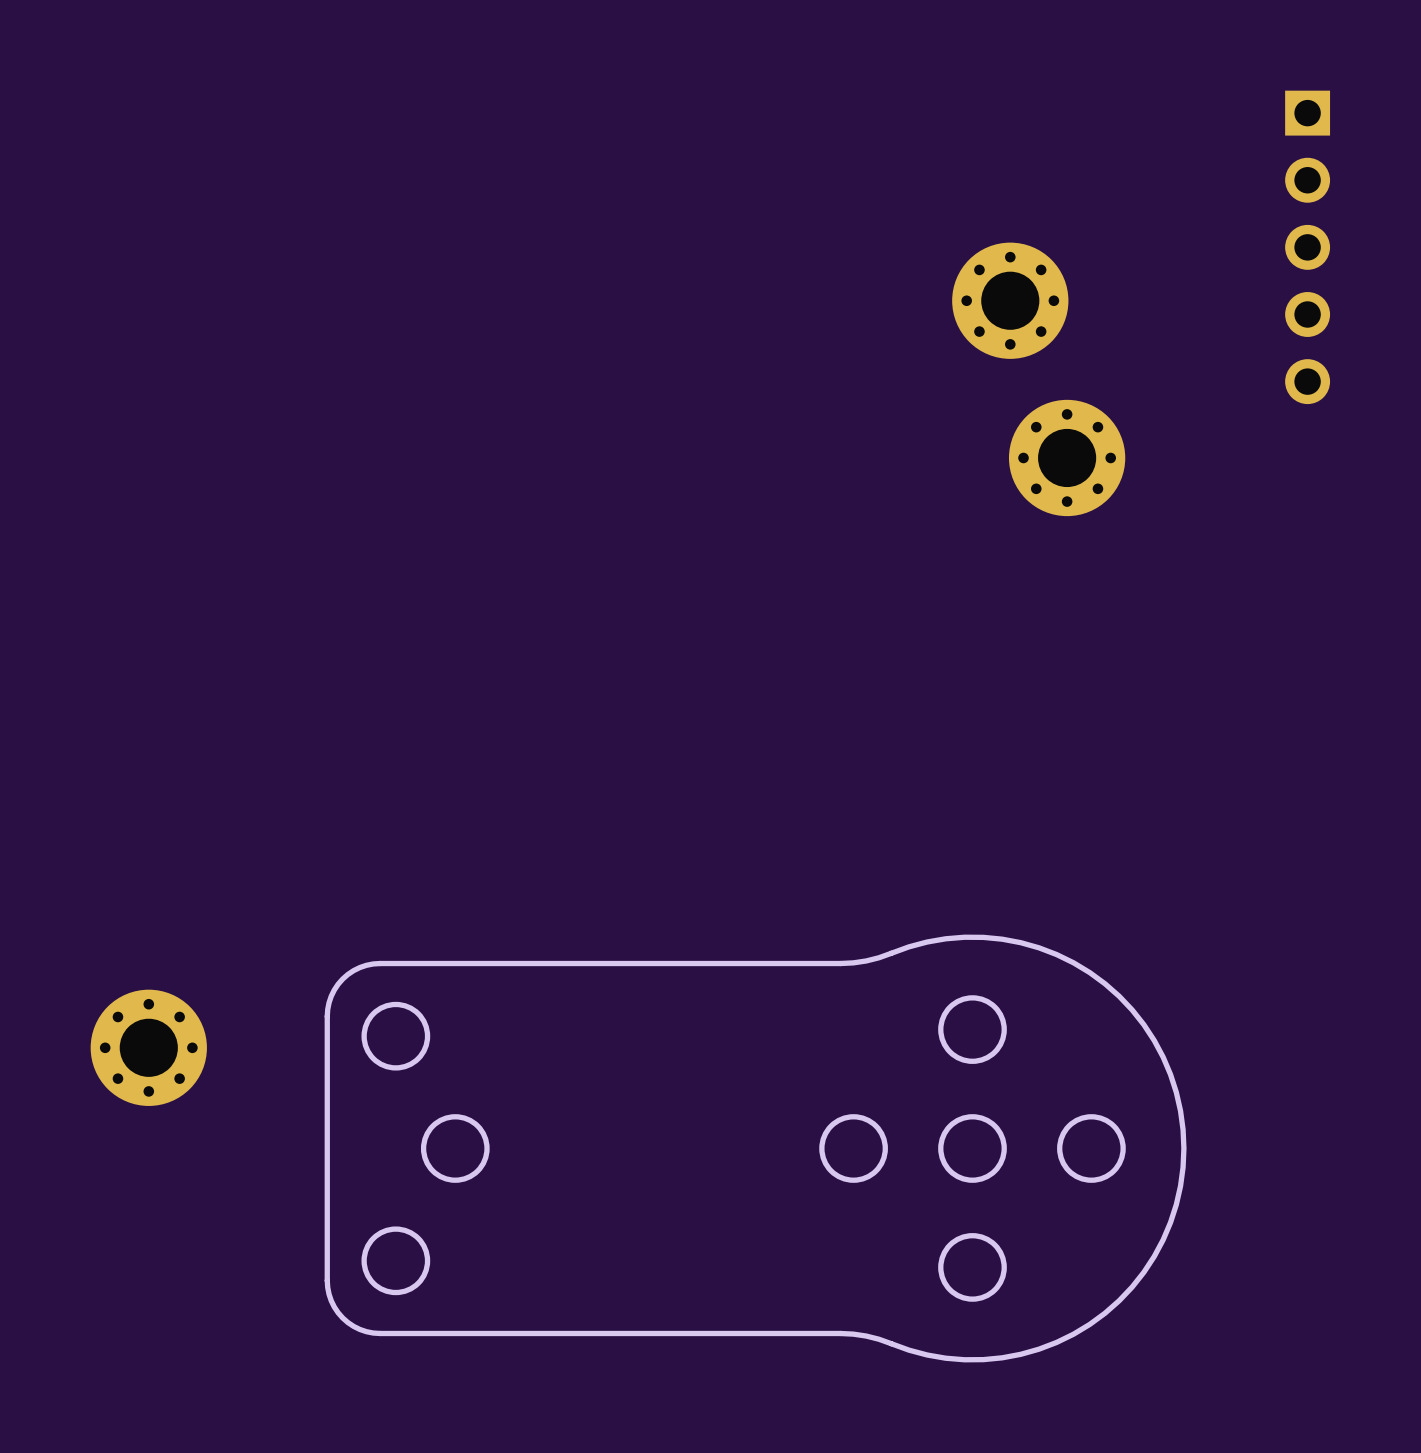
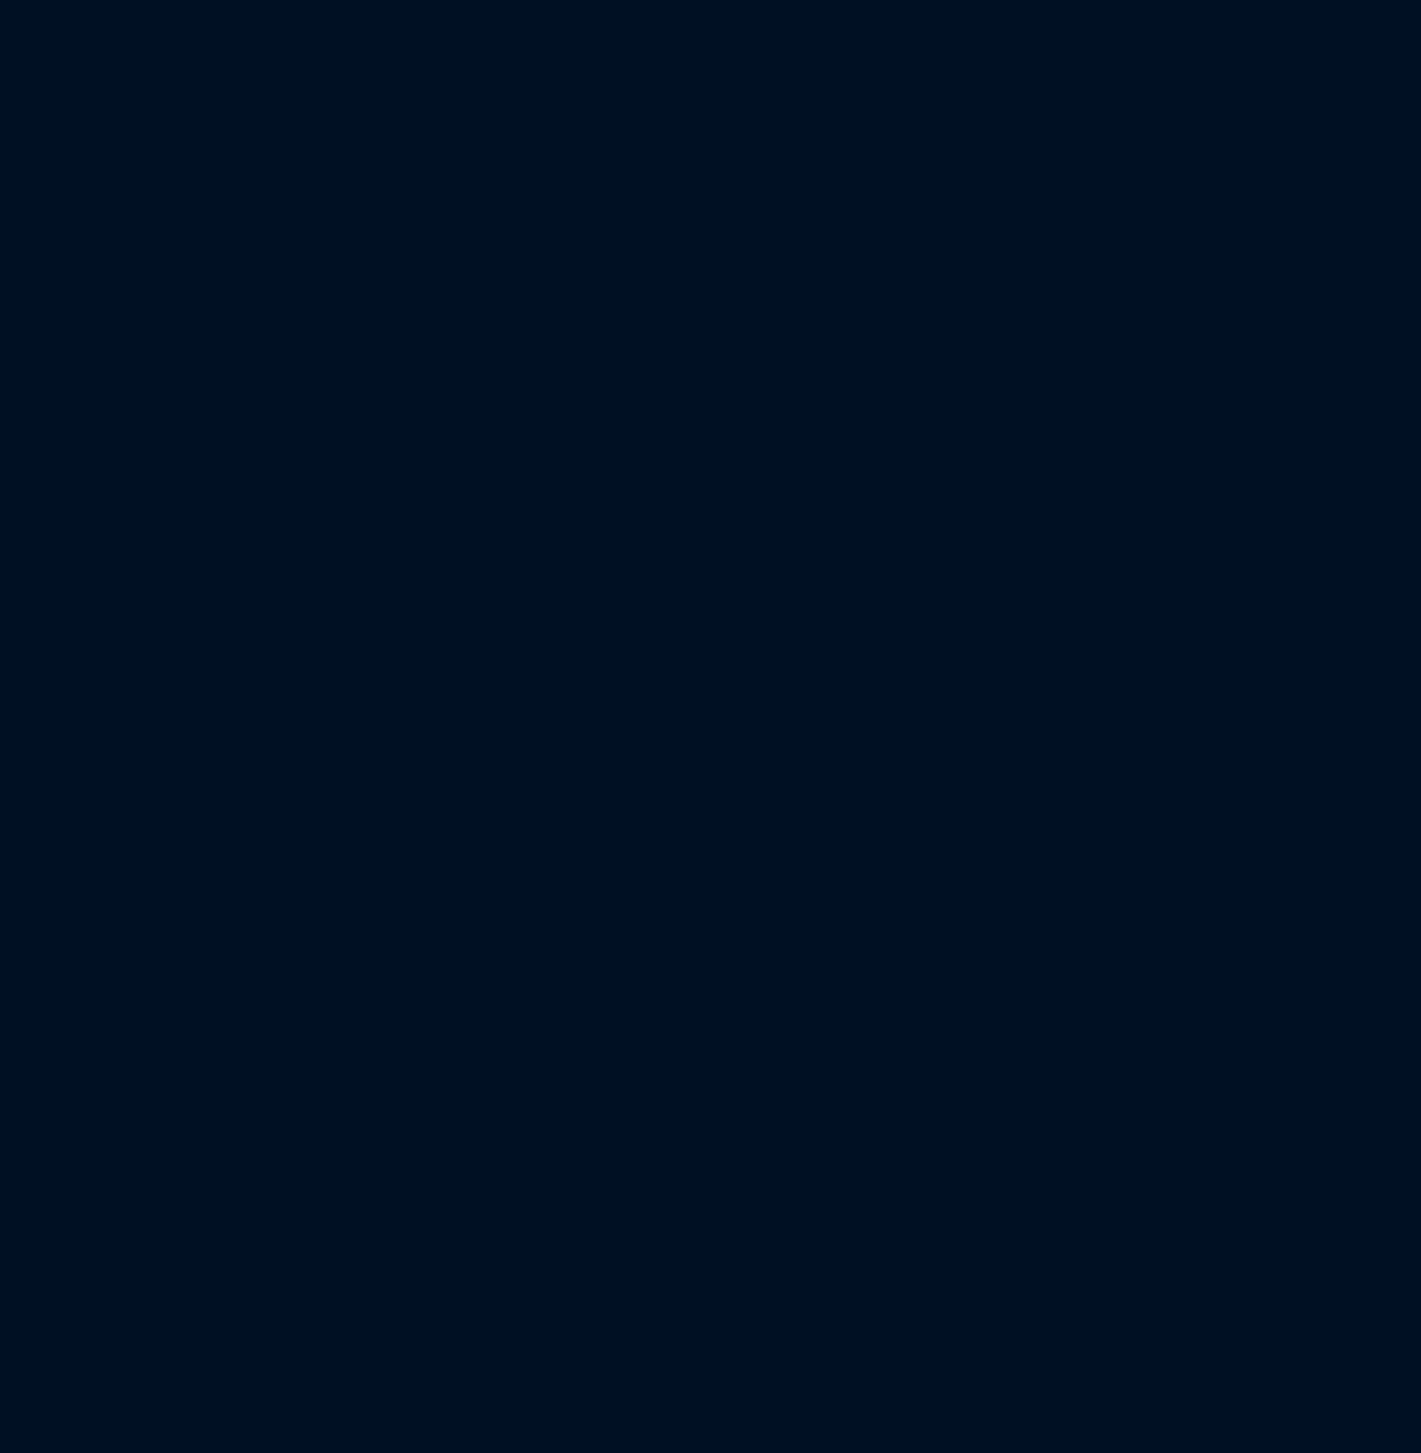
part: (1307, 247) -> none
part: (1010, 300) -> none
part: (1067, 457) -> none
board edge: (891, 953) (927, 942) (964, 937) (1002, 939) (1039, 947) (1073, 962) (1105, 983) (1132, 1009) (1154, 1040) (1170, 1074) (1180, 1110) (1183, 1148) (1180, 1186) (1170, 1222) (1154, 1256) (1132, 1287) (1119, 1300) (1089, 1324) (1056, 1342) (1020, 1354) (983, 1359) (964, 1359) (927, 1354) (866, 1336) (840, 1333) (373, 1333) (353, 1326) (342, 1318) (334, 1307) (329, 1294) (327, 1280) (327, 1016) (329, 1002) (334, 989) (342, 979) (353, 970) (366, 965) (380, 963) (840, 963) (866, 960) (891, 953) -> none
round board edge: [938, 995, 1007, 1064] -> none
round board edge: [361, 1001, 431, 1071] -> none
part: (148, 1047) -> none
round board edge: [420, 1114, 490, 1183] -> none
round board edge: [819, 1114, 888, 1183] -> none
round board edge: [938, 1114, 1007, 1183] -> none
round board edge: [1057, 1114, 1126, 1183] -> none
round board edge: [361, 1226, 431, 1296] -> none
round board edge: [938, 1233, 1007, 1302] -> none

